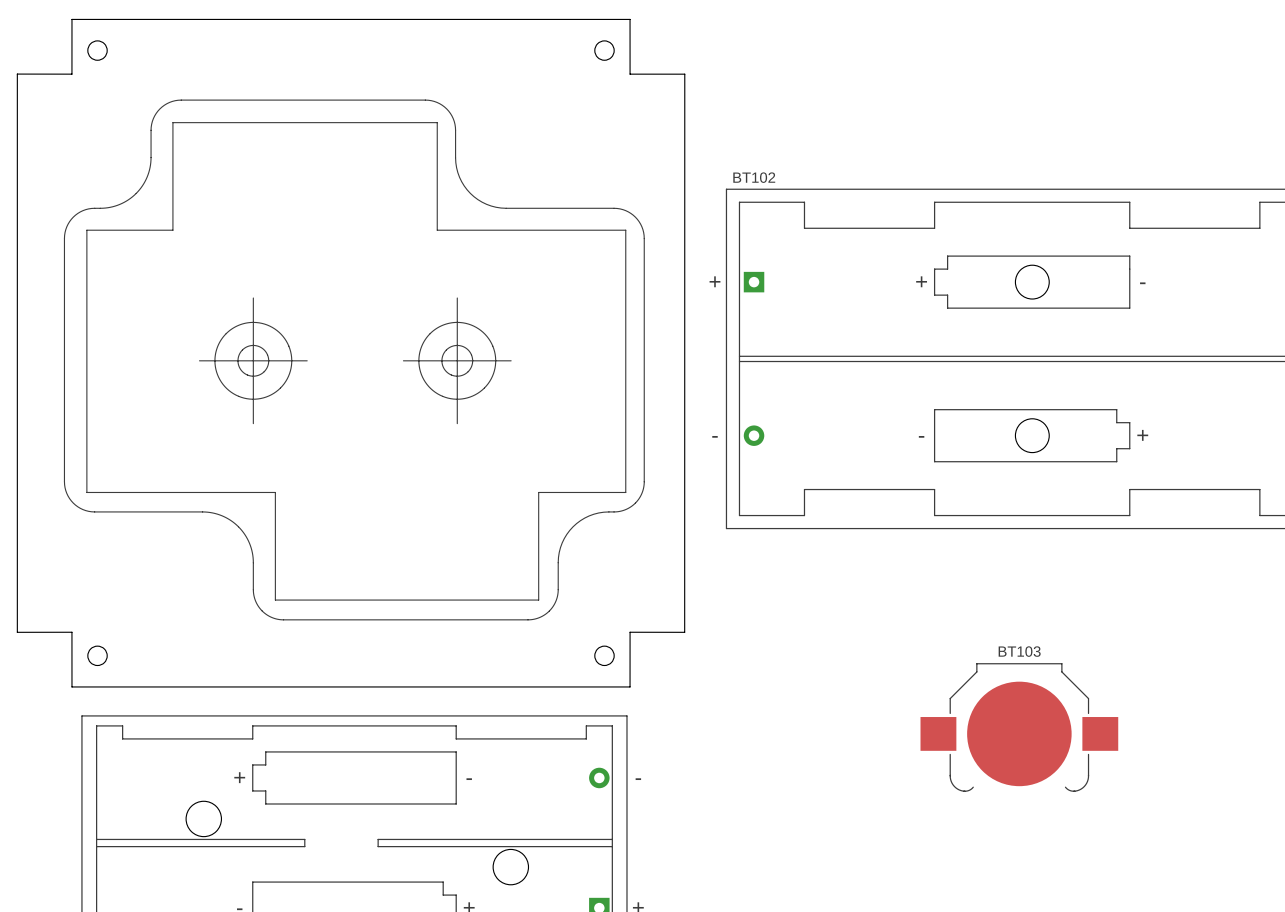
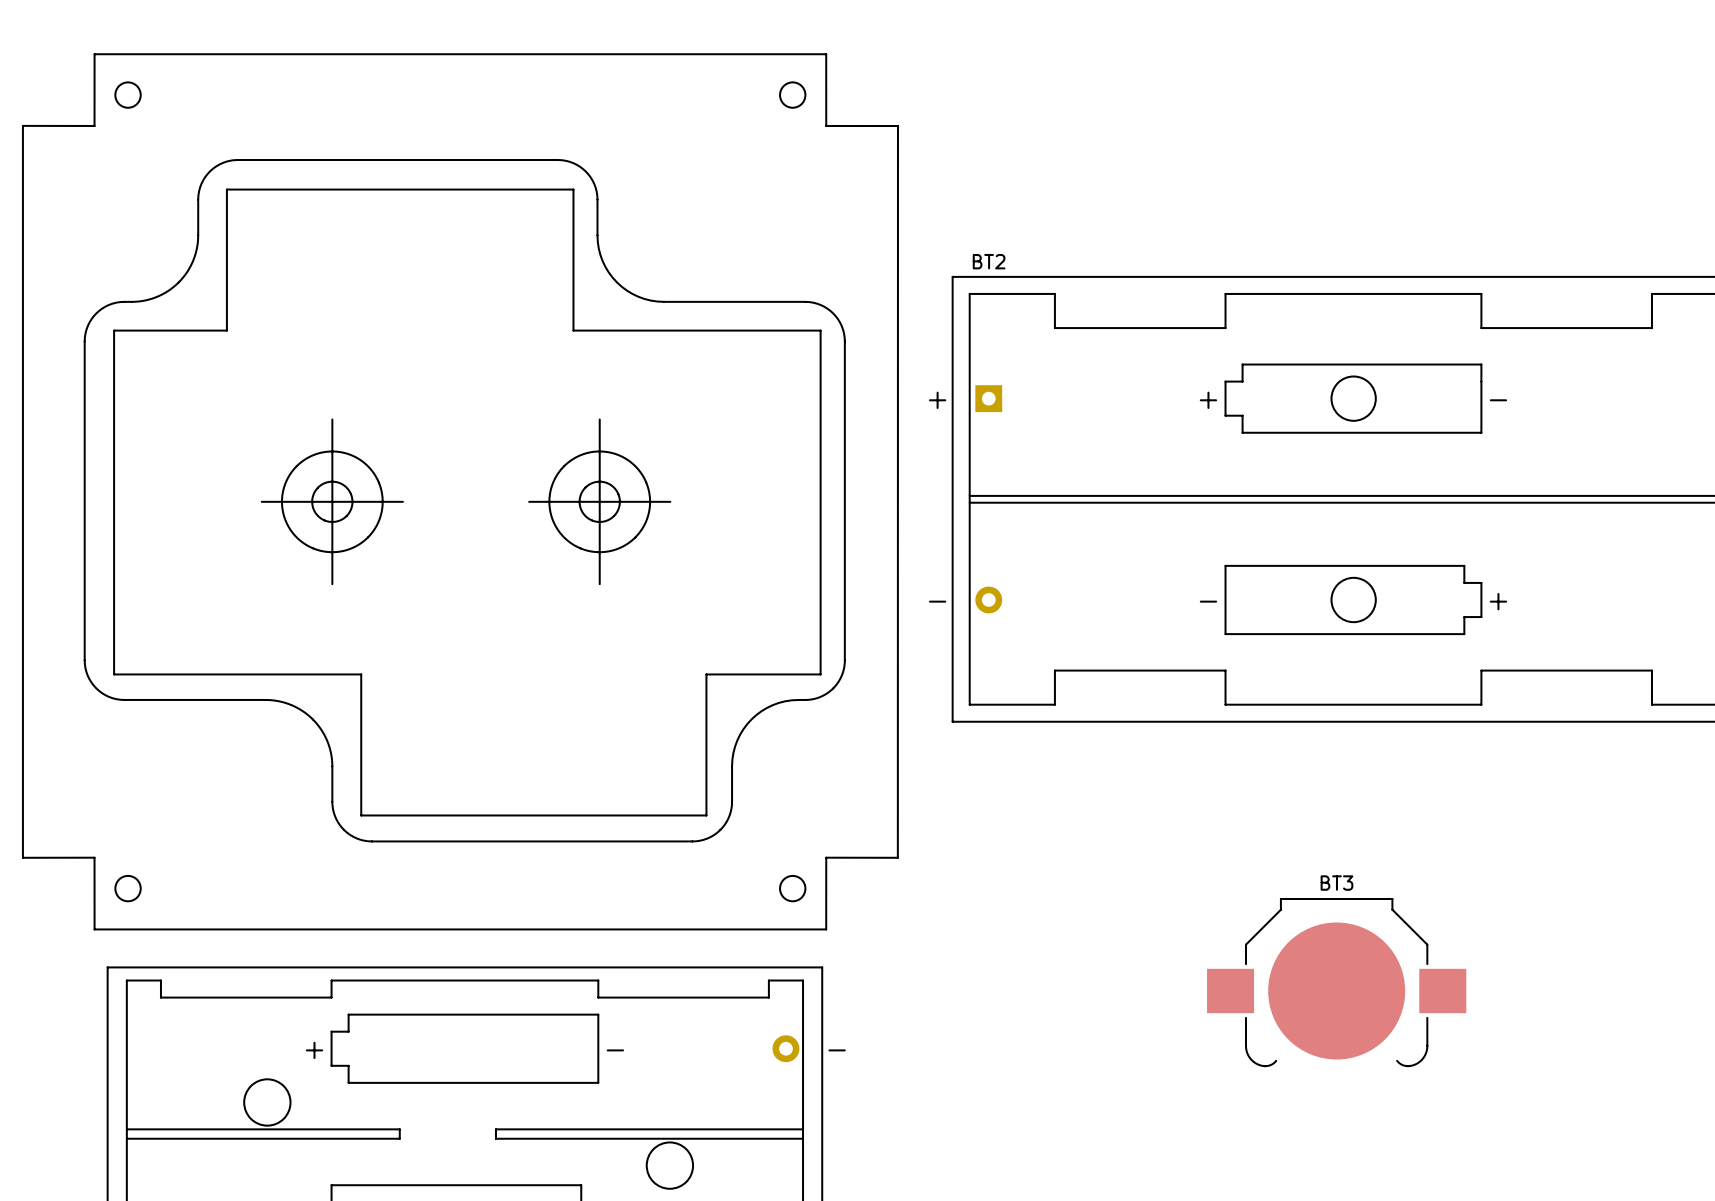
BT102 name: BT102 (754, 177) -> BT2 (989, 261)
BT103 name: BT103 (1019, 651) -> BT3 (1336, 883)

